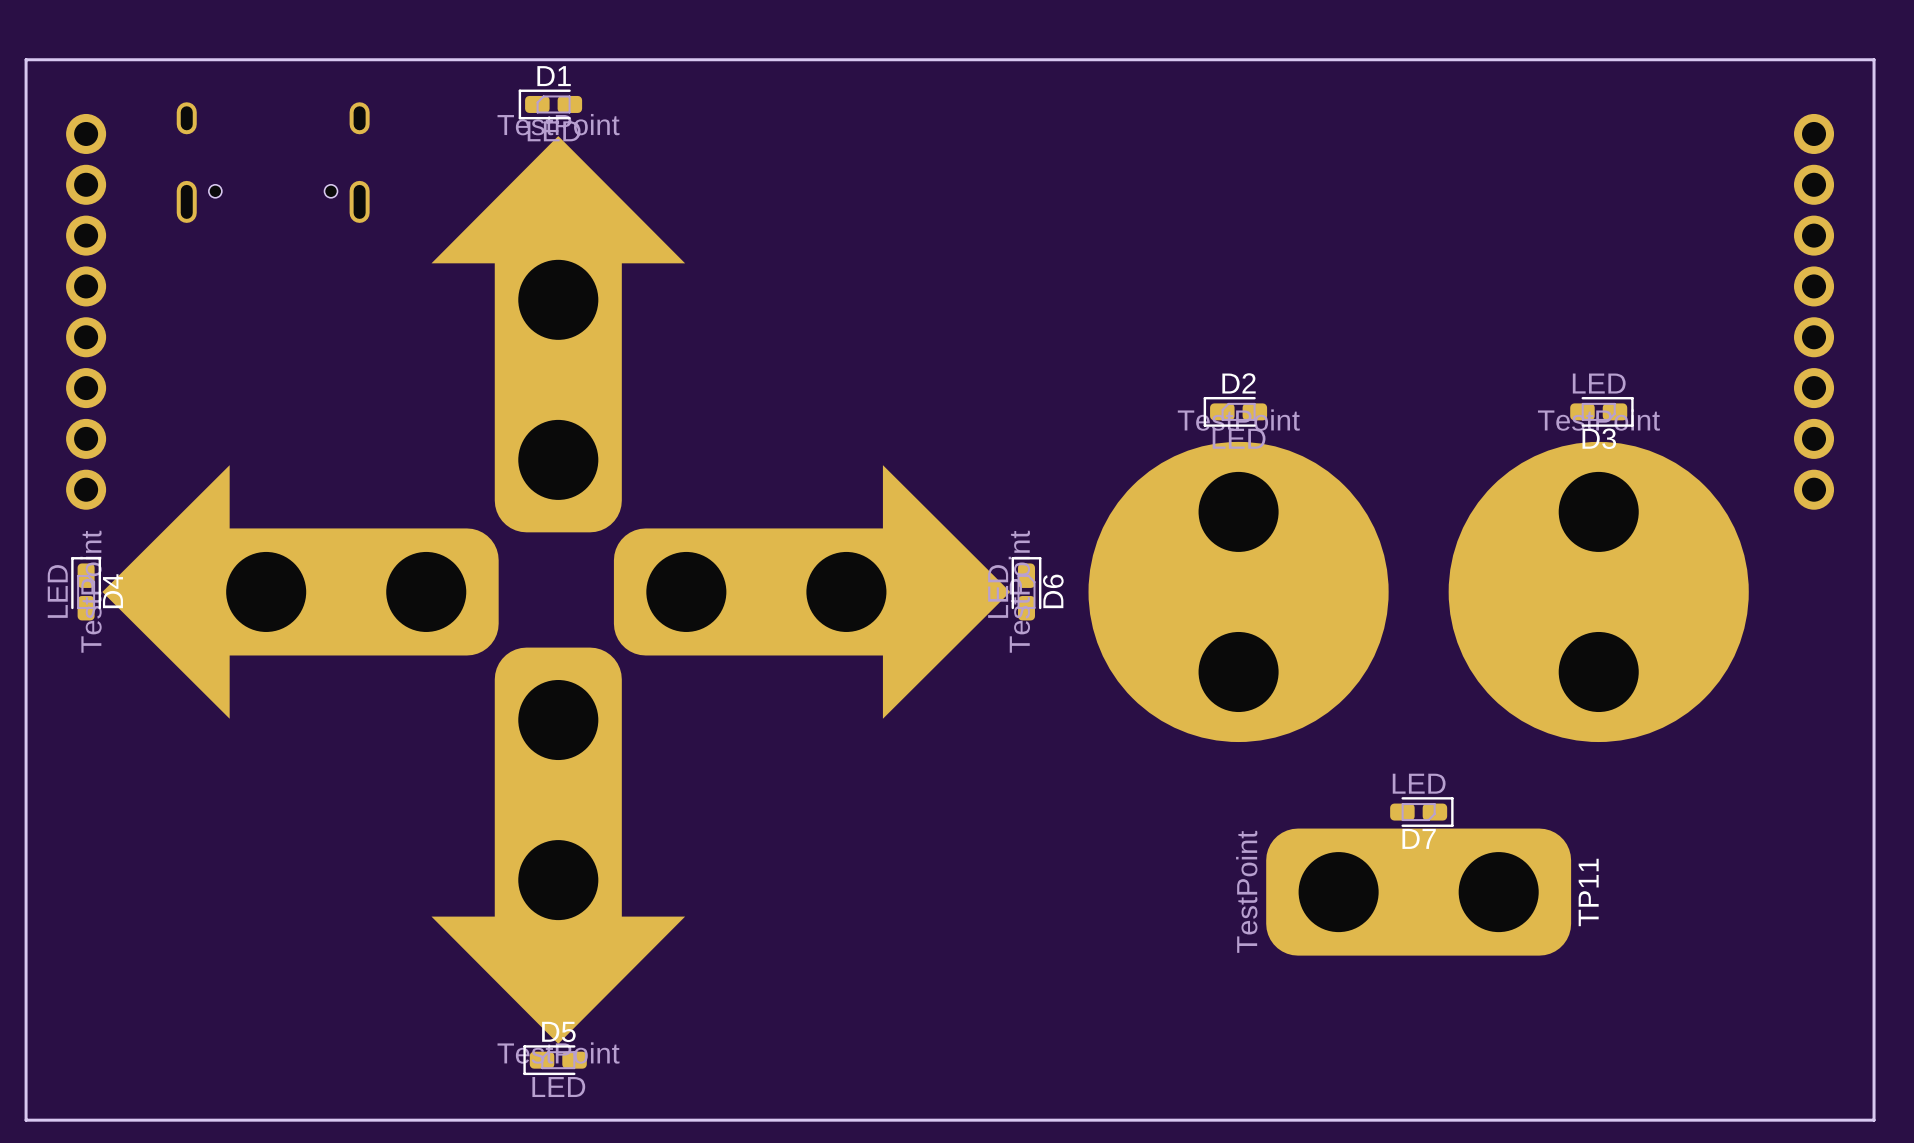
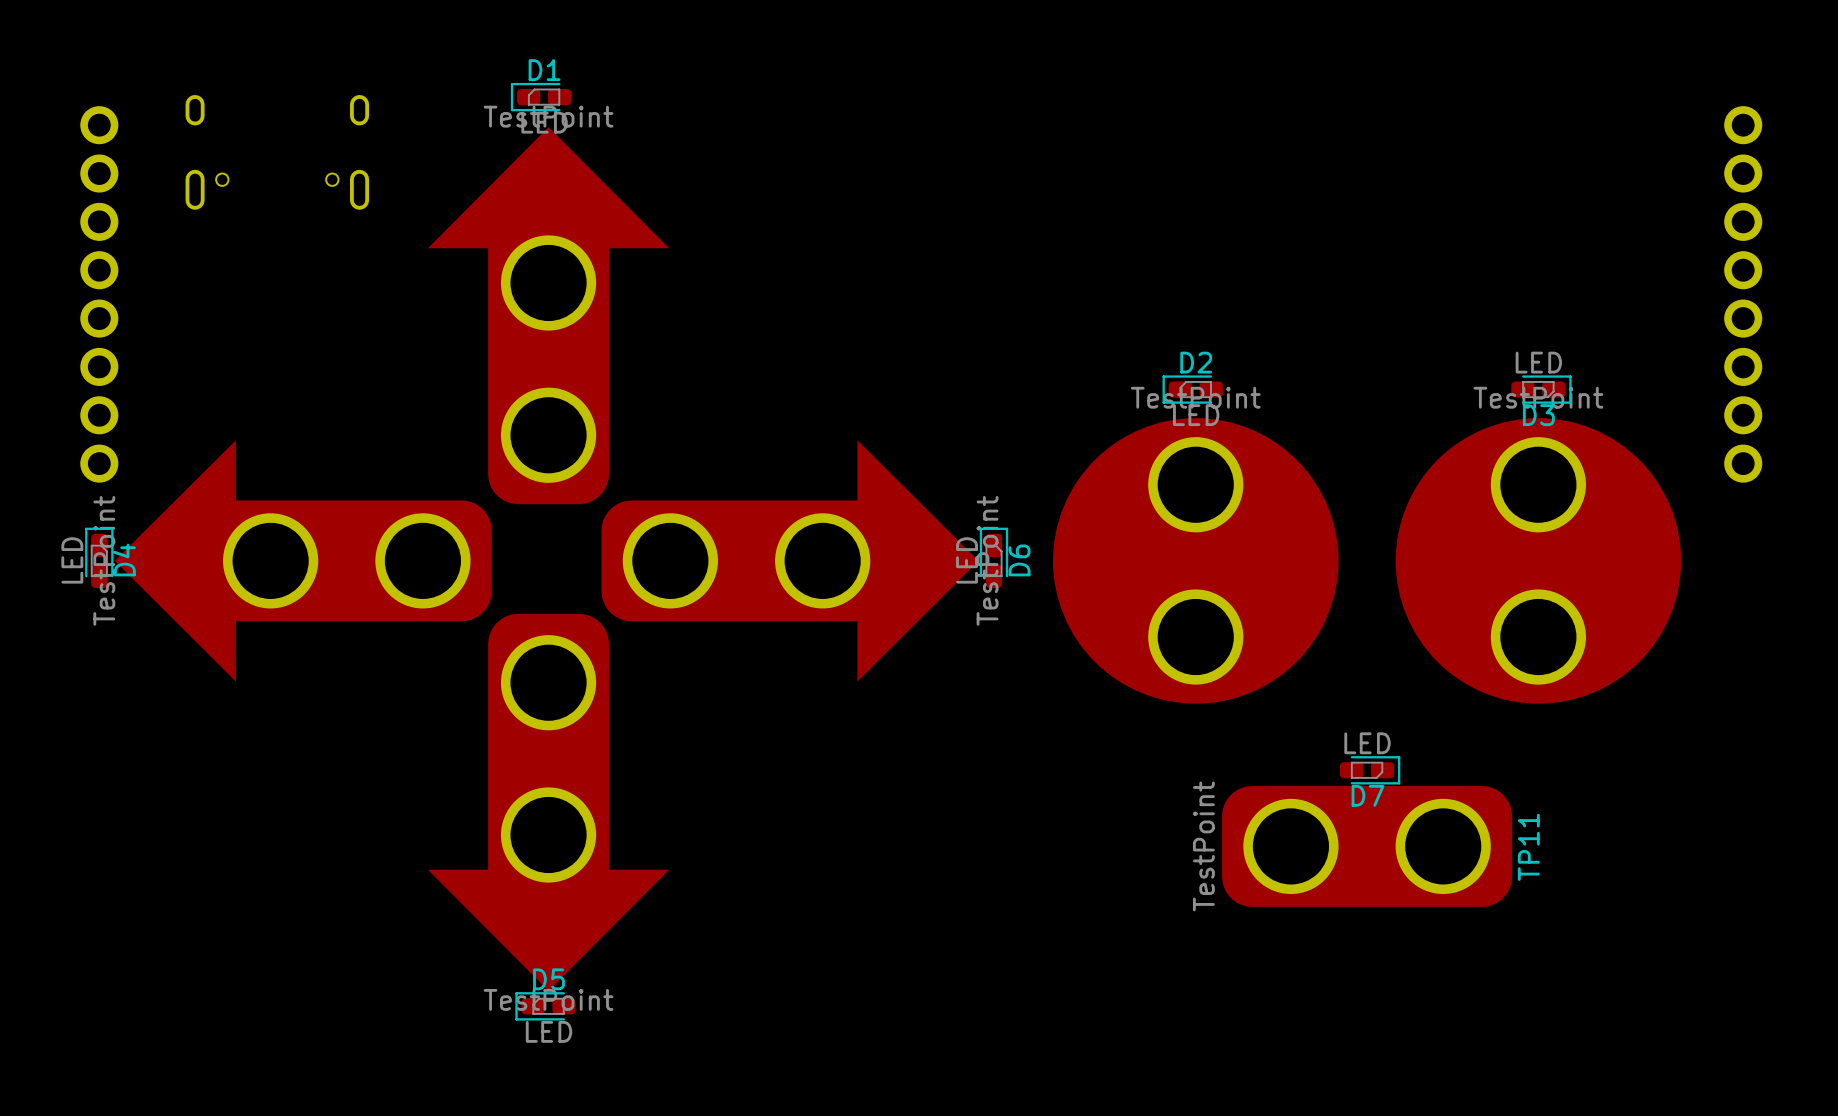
board edge: (26, 59) (26, 1120) (1874, 1120) (1874, 59) (26, 59) -> none

